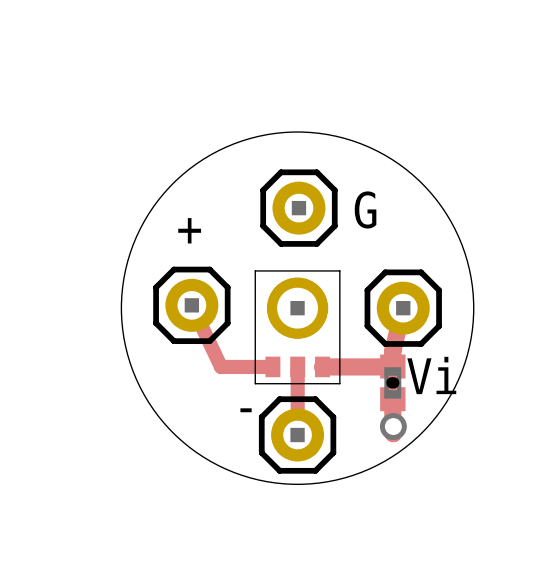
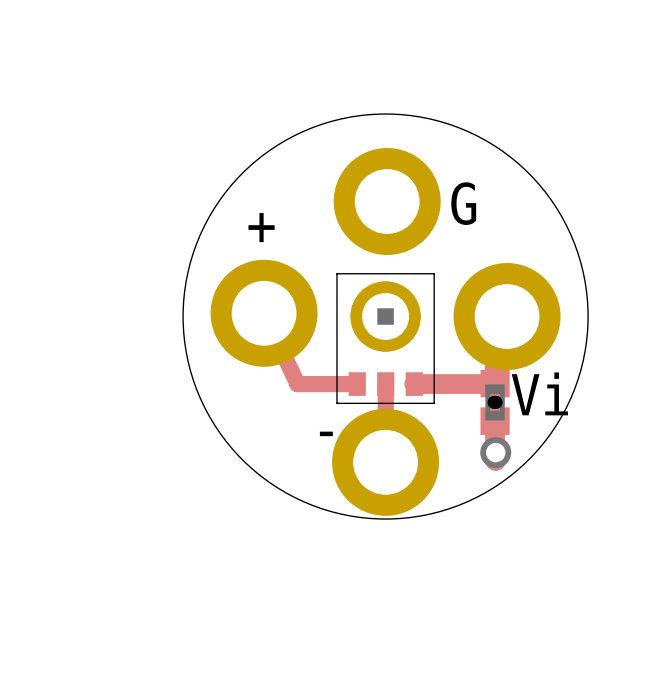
part footprint: [260, 169, 338, 247] -> [333, 148, 441, 255]
part footprint: [153, 266, 231, 345] -> [210, 259, 318, 367]
part footprint: [364, 269, 442, 347] -> [453, 263, 561, 371]
part footprint: [258, 396, 337, 474] -> [332, 408, 440, 516]

